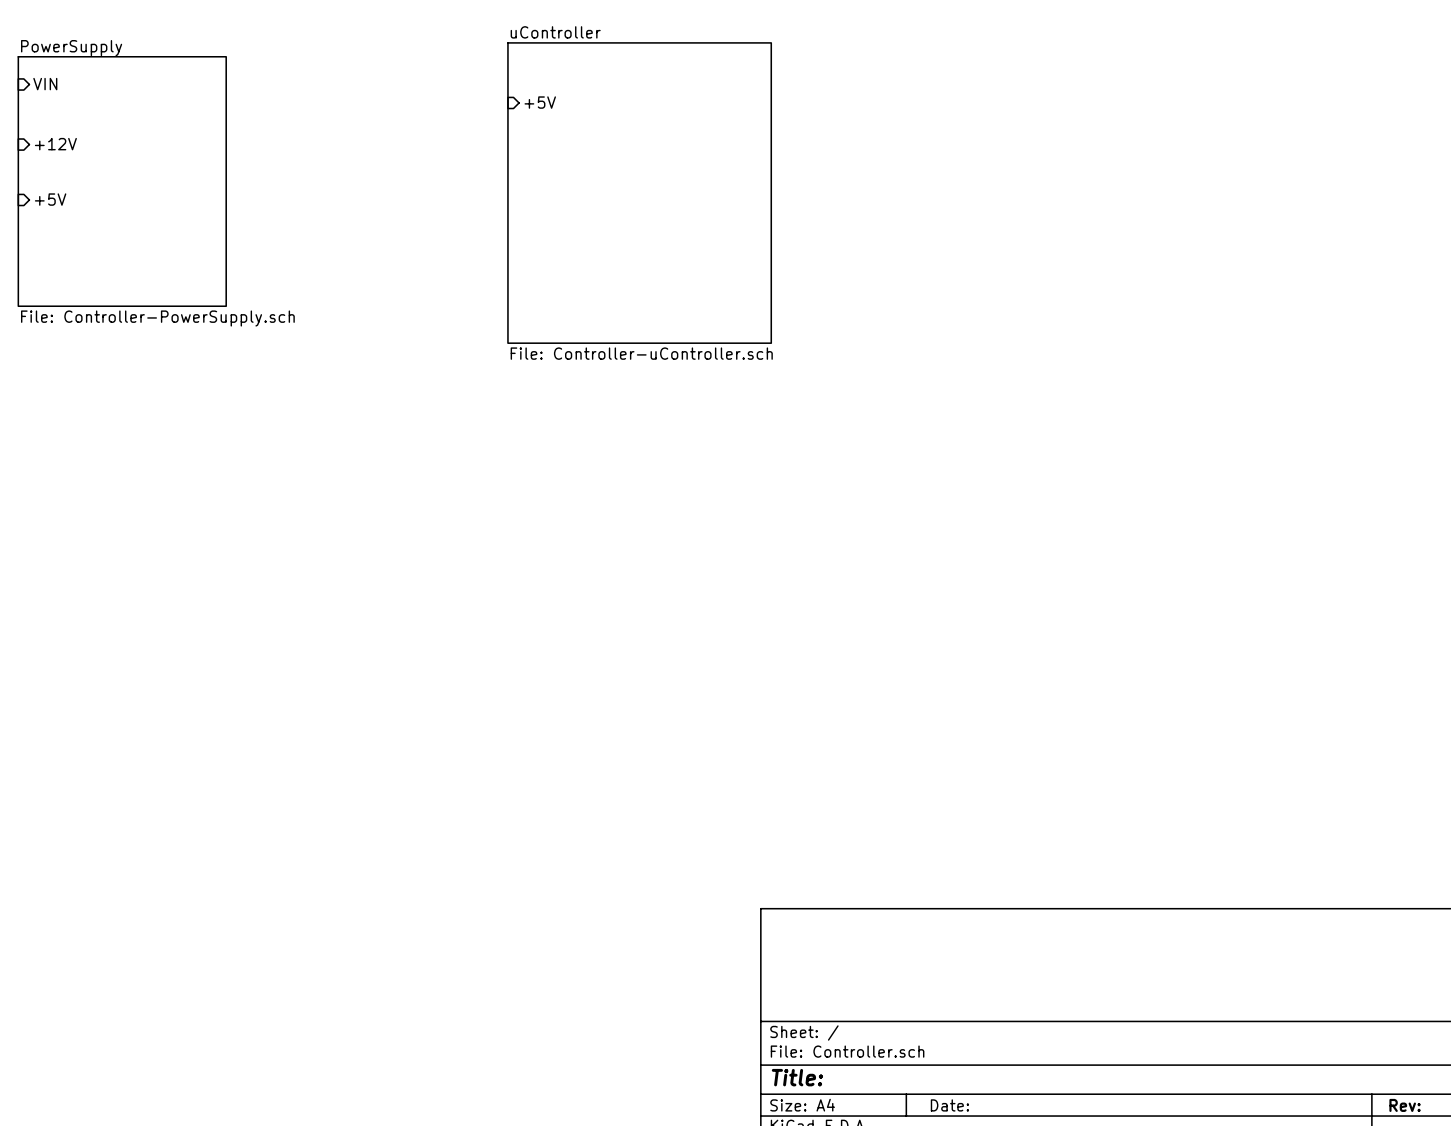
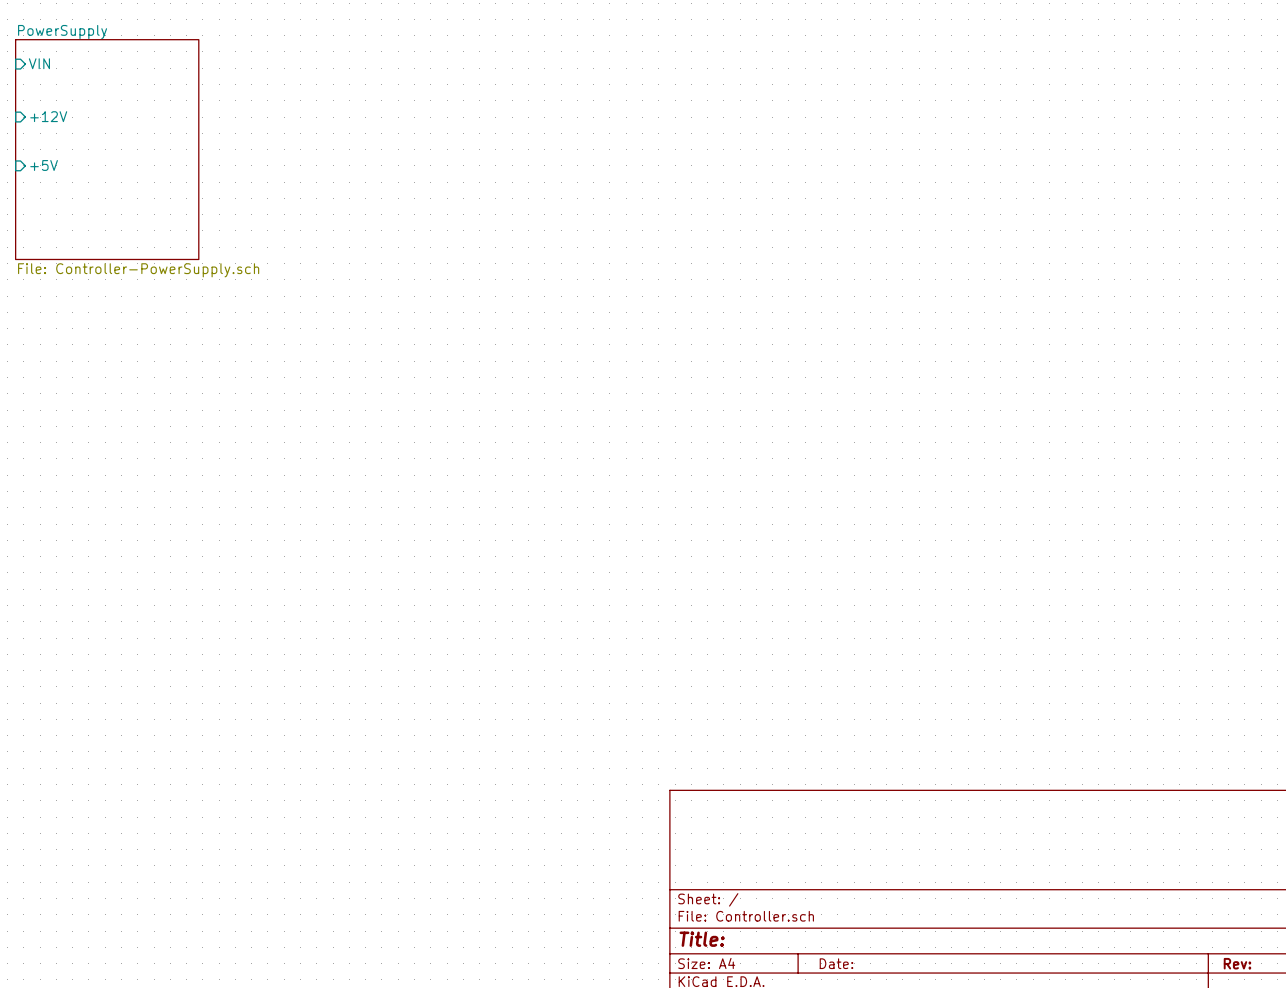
sheet pin: +5V (540, 102) -> none
sheet uController: File: Controller-uController.sch (639, 193) -> none

